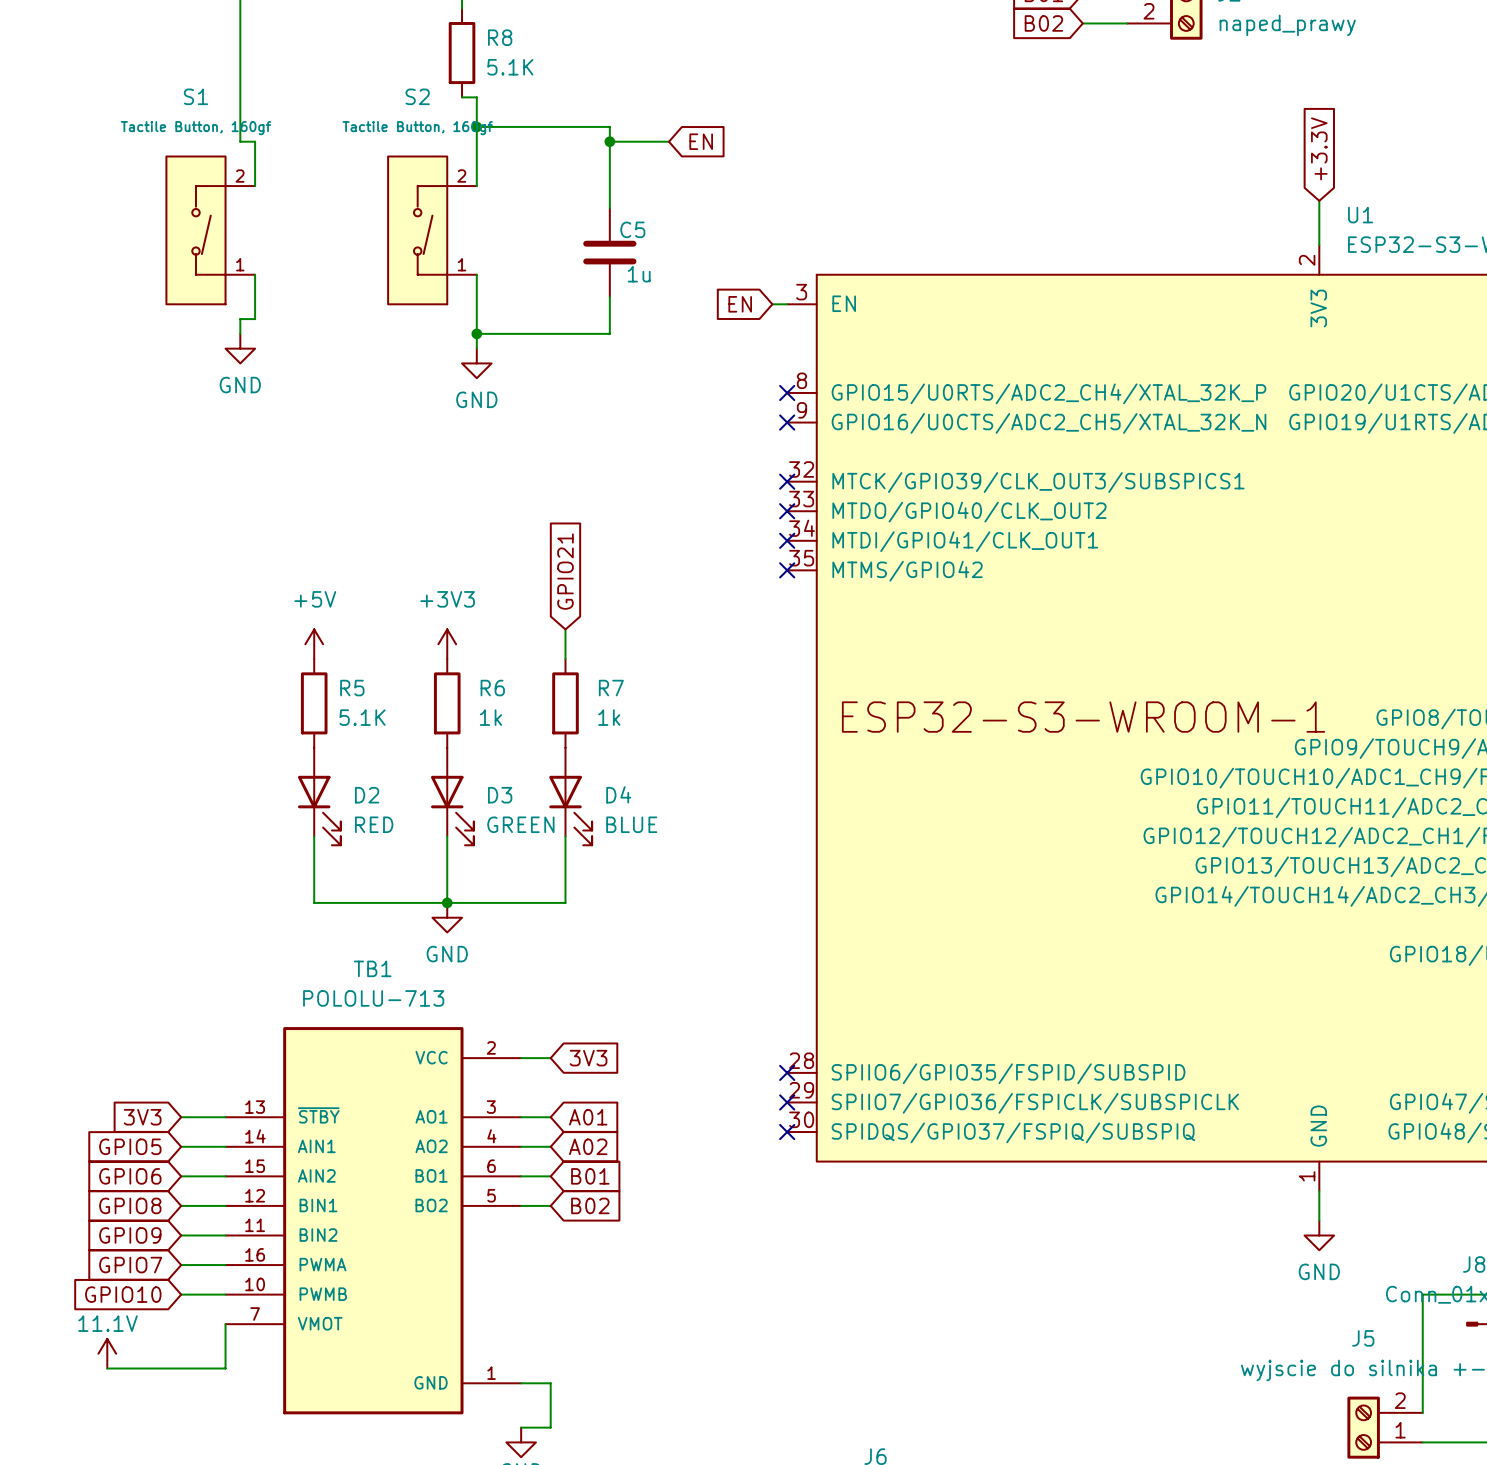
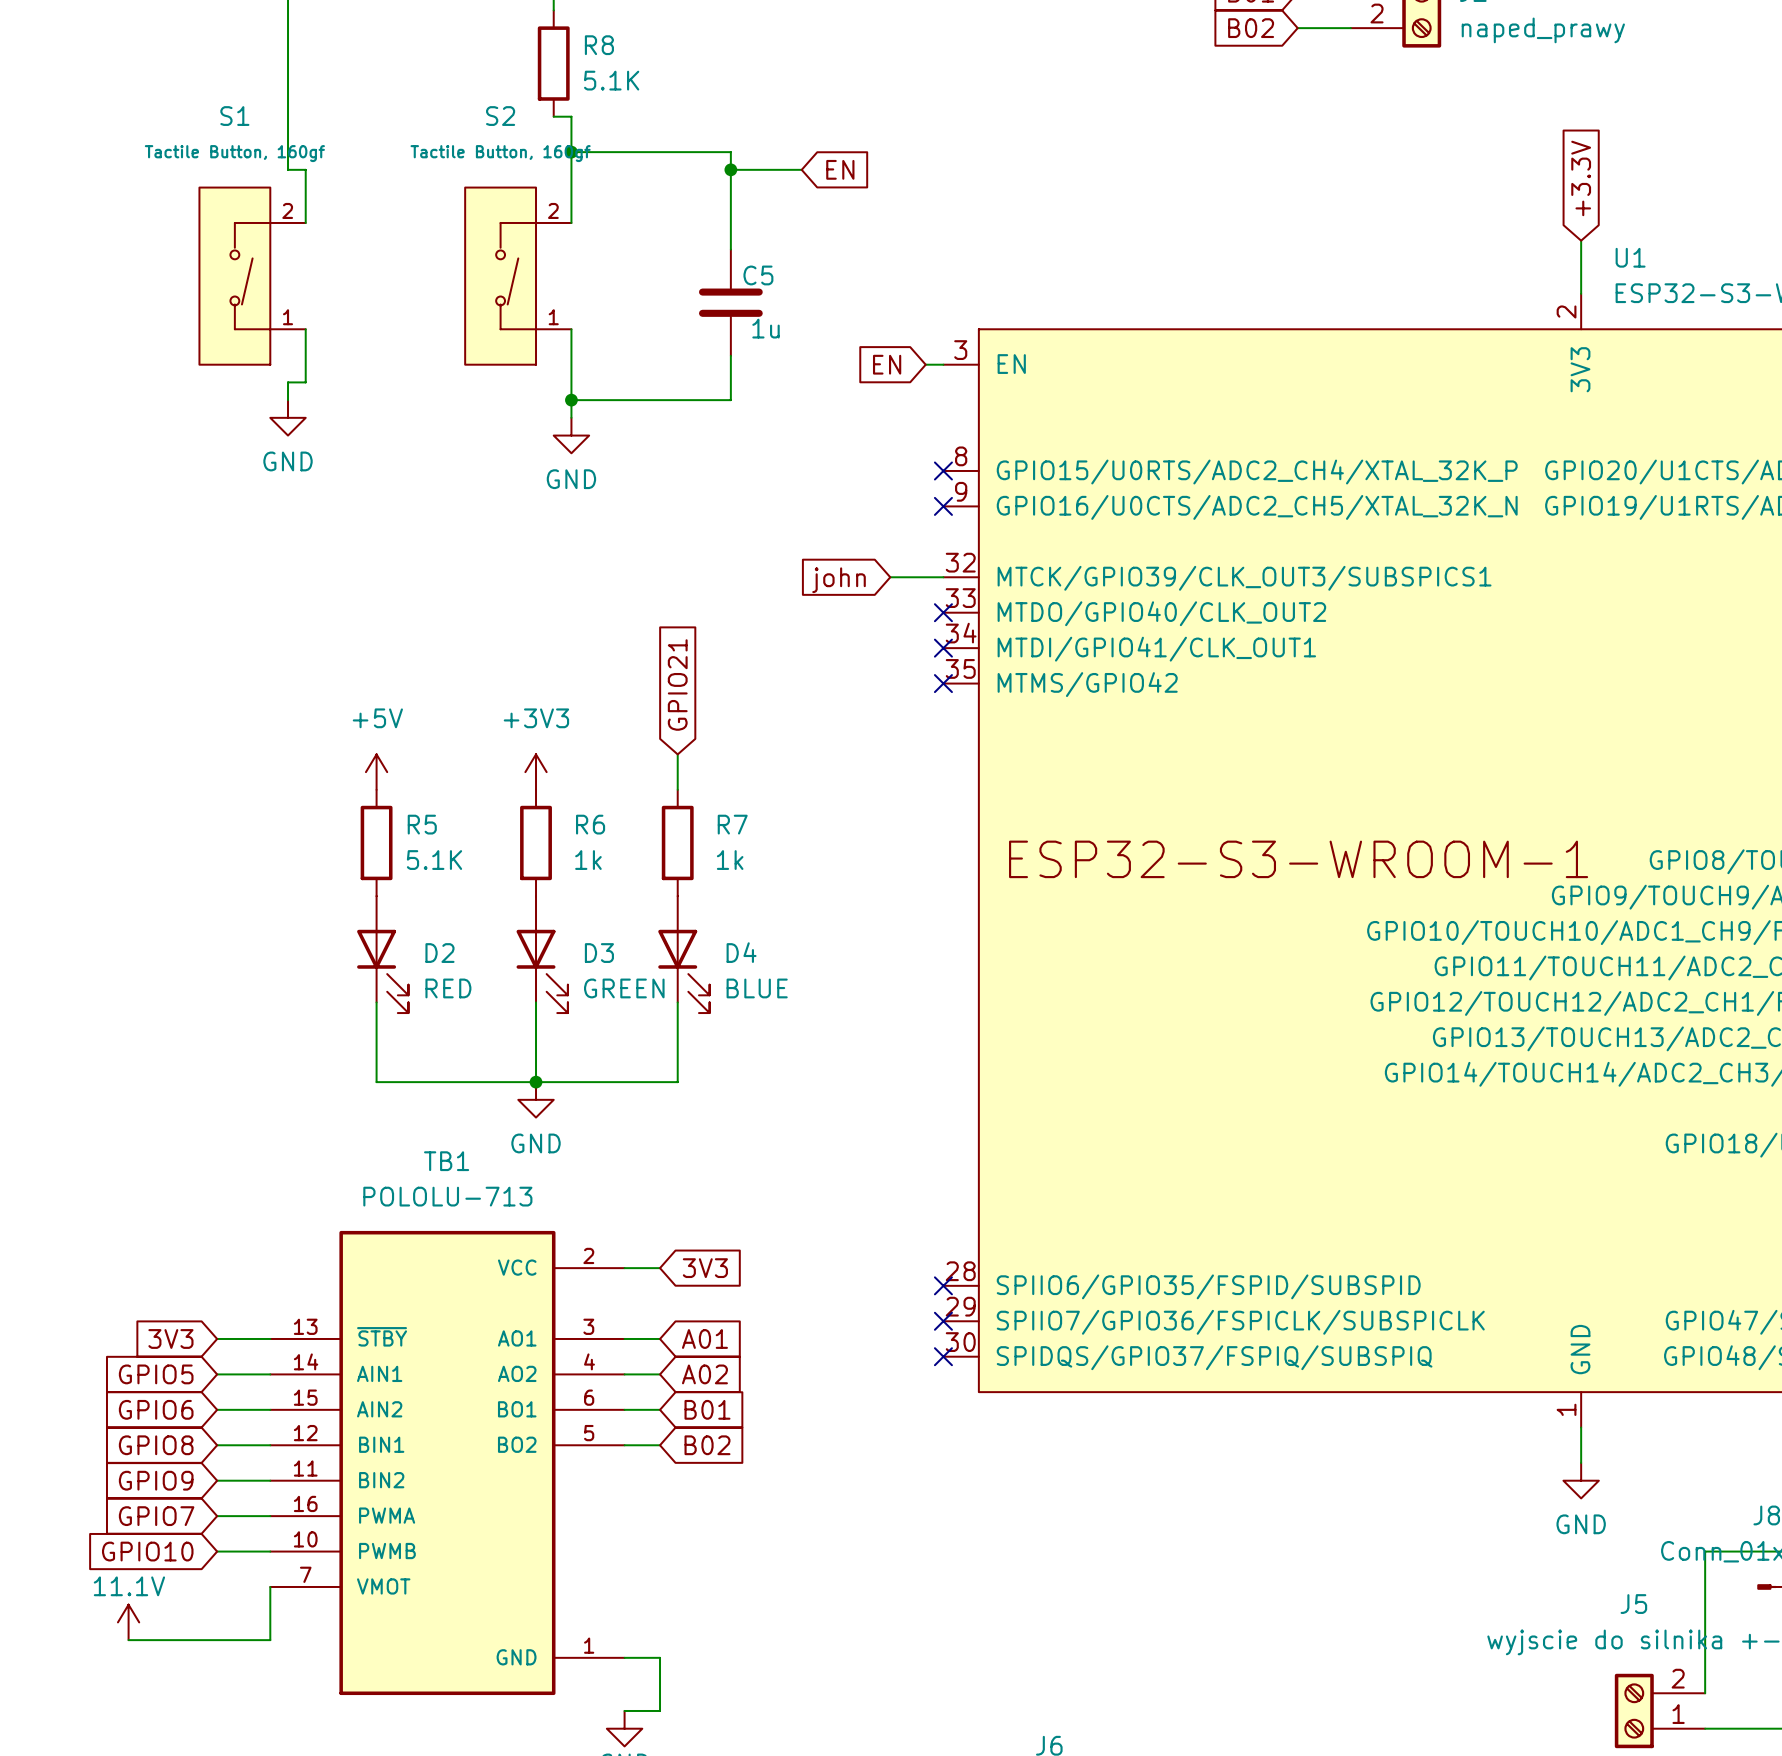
wire: none -> (890, 577) (943, 577)
no-connect mark: (787, 481) -> none
global label: none -> john (839, 580)

